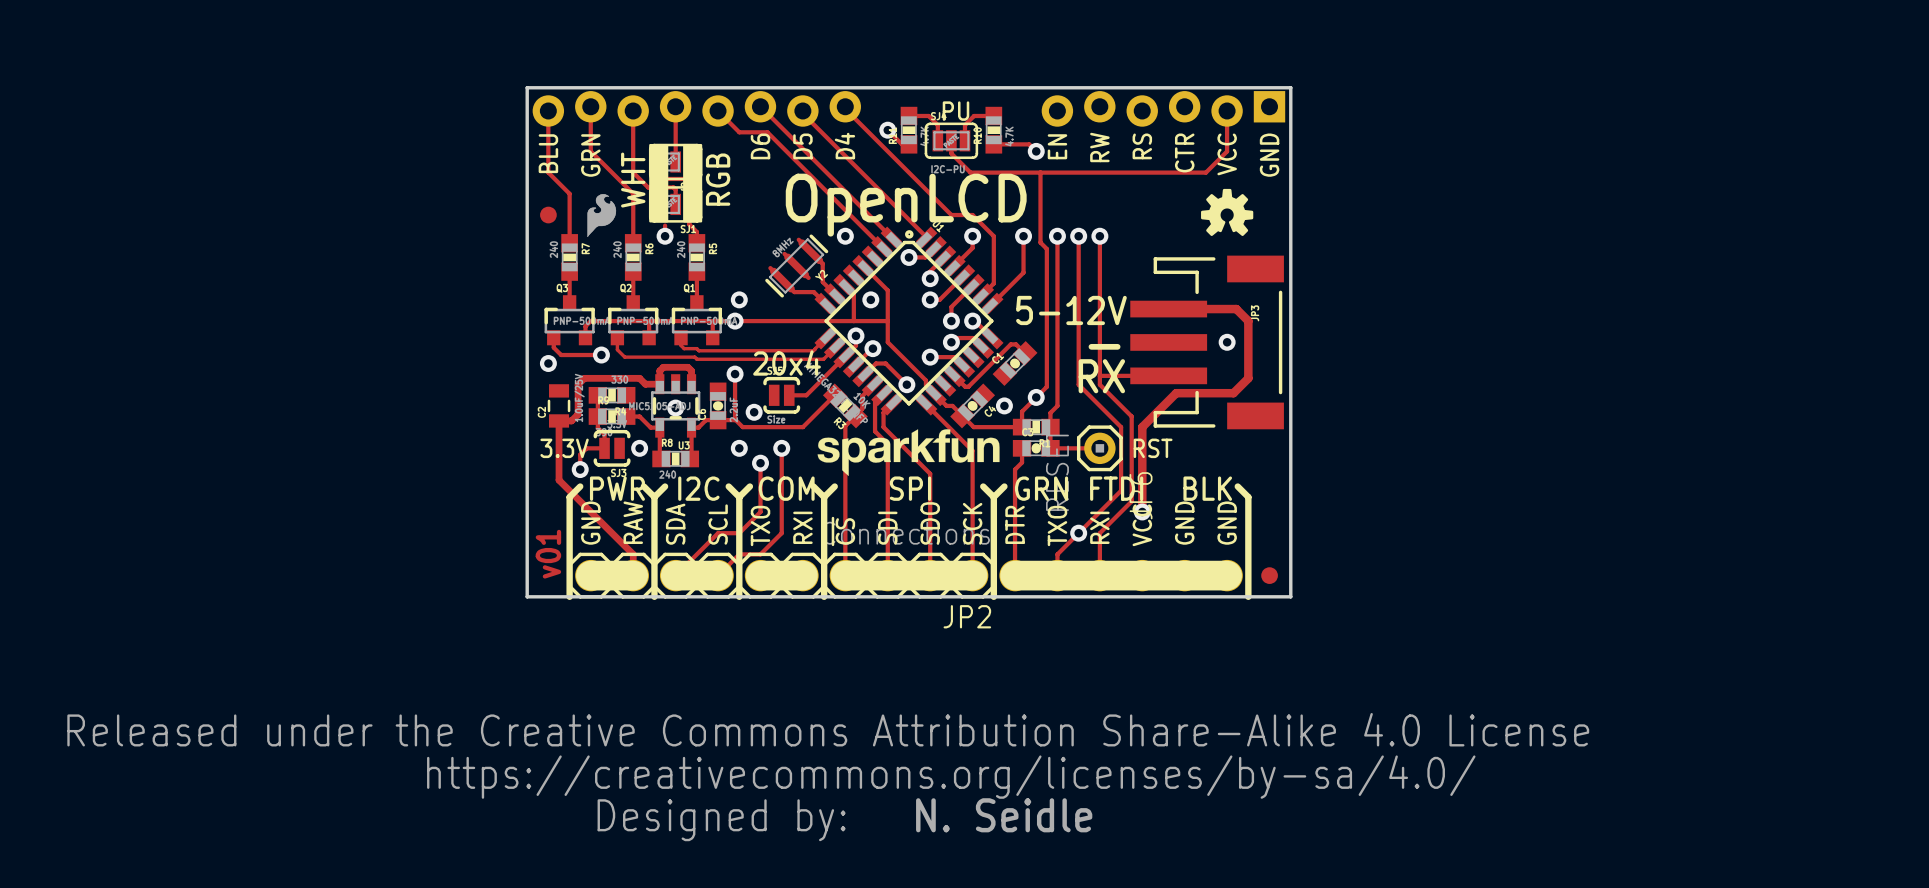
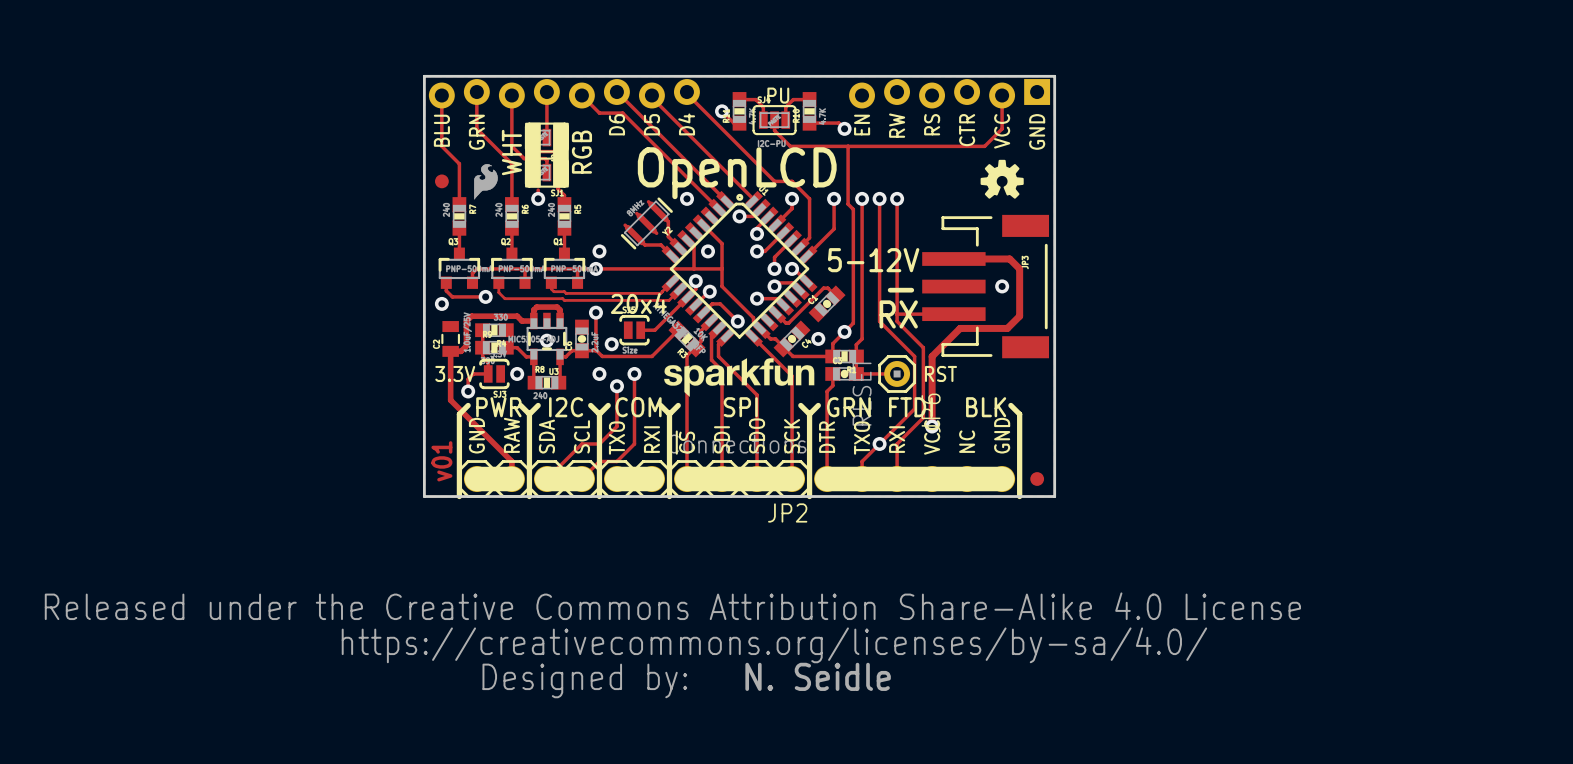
text: GND (1184, 523) -> NC (967, 441)

